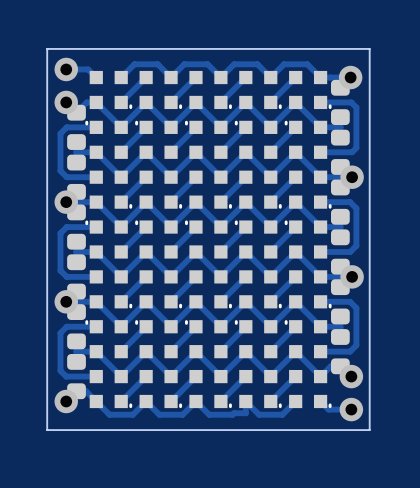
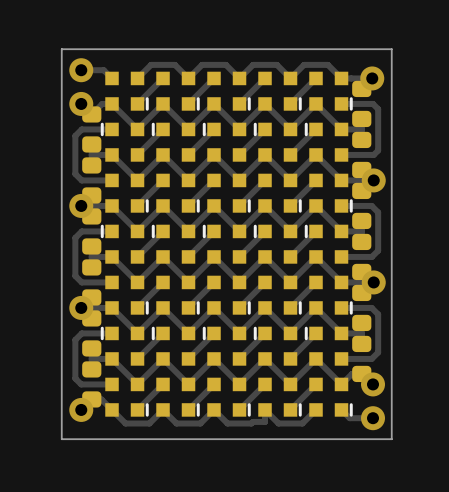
part footprint: [89, 70, 133, 110] -> [105, 71, 149, 111]
part footprint: [139, 70, 183, 110] -> [156, 71, 200, 111]
part footprint: [189, 70, 232, 110] -> [207, 71, 251, 111]
part footprint: [239, 70, 282, 110] -> [258, 71, 302, 111]
part footprint: [289, 70, 332, 110] -> [309, 71, 353, 111]
part footprint: [85, 120, 128, 159] -> [100, 122, 145, 162]
part footprint: [135, 120, 178, 159] -> [151, 122, 196, 162]
part footprint: [184, 120, 228, 159] -> [202, 122, 247, 162]
part footprint: [234, 120, 278, 159] -> [253, 122, 298, 162]
part footprint: [284, 120, 328, 159] -> [304, 122, 349, 162]
part footprint: [89, 170, 133, 209] -> [105, 173, 149, 213]
part footprint: [139, 170, 183, 209] -> [156, 173, 200, 213]
part footprint: [189, 170, 232, 209] -> [207, 173, 251, 213]
part footprint: [239, 170, 282, 209] -> [258, 173, 302, 213]
part footprint: [289, 170, 332, 209] -> [309, 173, 353, 213]
part footprint: [85, 220, 128, 259] -> [100, 224, 145, 264]
part footprint: [135, 220, 178, 259] -> [151, 224, 196, 264]
part footprint: [184, 220, 228, 259] -> [202, 224, 247, 264]
part footprint: [234, 220, 278, 259] -> [253, 224, 298, 264]
part footprint: [284, 220, 328, 259] -> [304, 224, 349, 264]
part footprint: [89, 270, 133, 309] -> [105, 275, 149, 315]
part footprint: [139, 270, 183, 309] -> [156, 275, 200, 315]
part footprint: [189, 270, 232, 309] -> [207, 275, 251, 315]
part footprint: [239, 270, 282, 309] -> [258, 275, 302, 315]
part footprint: [289, 270, 332, 309] -> [309, 275, 353, 315]
part footprint: [85, 320, 128, 359] -> [100, 326, 145, 366]
part footprint: [135, 320, 178, 359] -> [151, 326, 196, 366]
part footprint: [184, 320, 228, 359] -> [202, 326, 247, 366]
part footprint: [234, 320, 278, 359] -> [253, 326, 298, 366]
part footprint: [284, 320, 328, 359] -> [304, 326, 349, 366]
part footprint: [89, 369, 133, 409] -> [105, 377, 149, 417]
part footprint: [139, 369, 183, 409] -> [156, 377, 200, 417]
part footprint: [189, 369, 232, 409] -> [207, 377, 251, 417]
part footprint: [239, 369, 282, 409] -> [258, 377, 302, 417]
part footprint: [289, 369, 332, 409] -> [309, 377, 353, 417]

